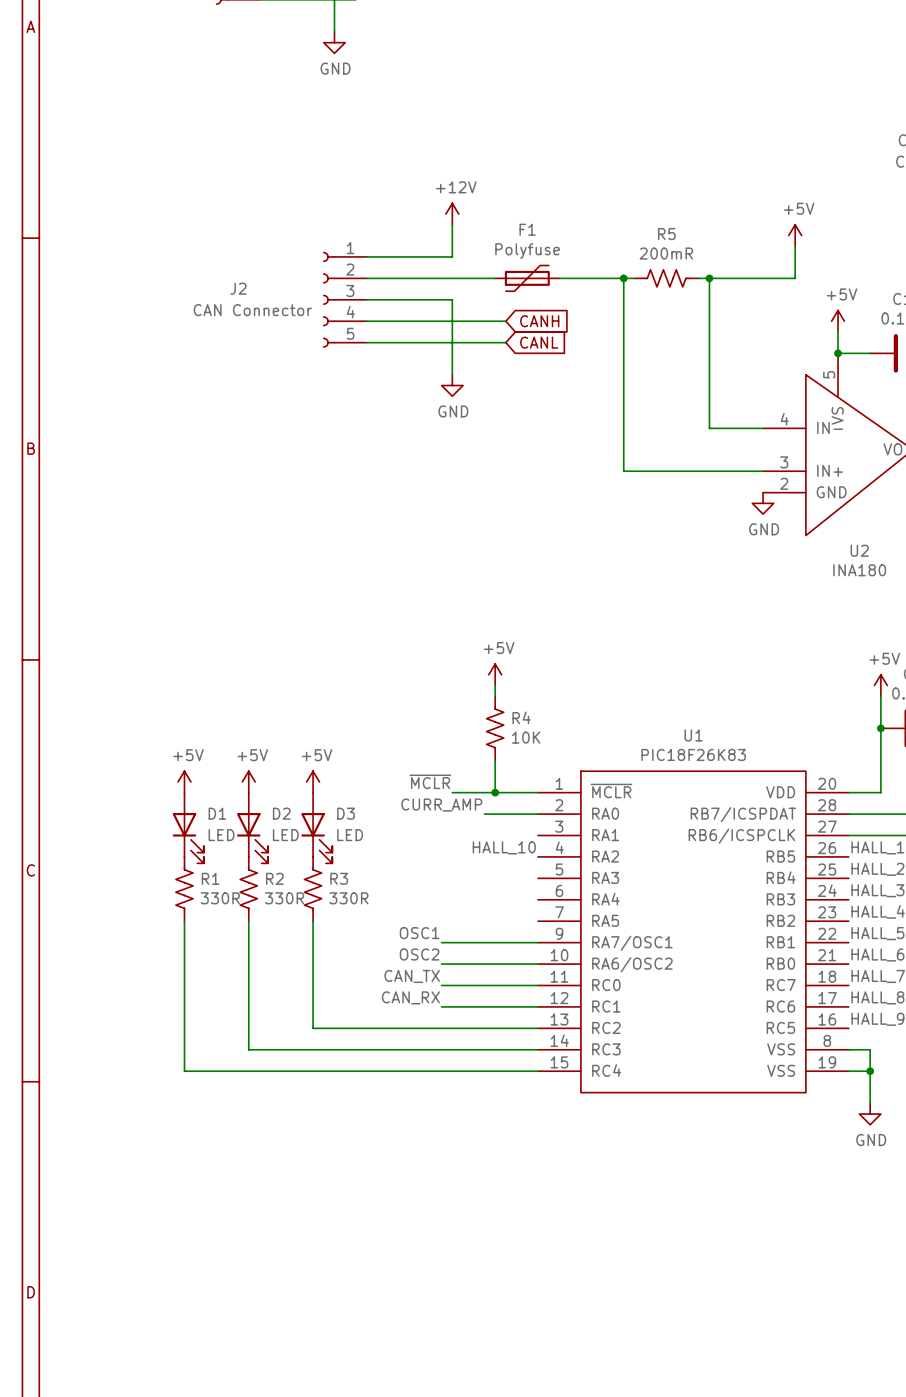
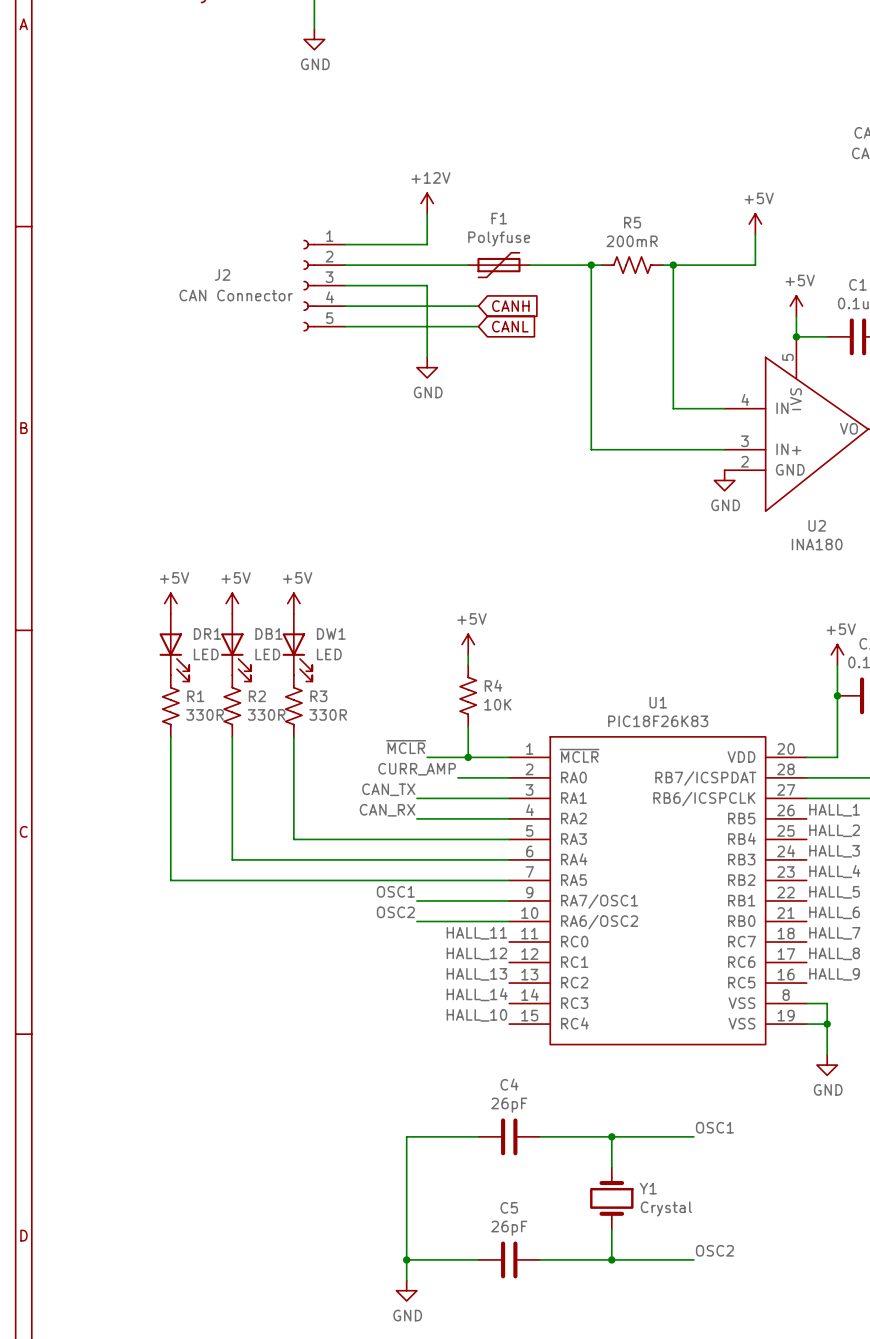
power symbol: none -> +5V (170, 603)
power symbol: none -> +5V (232, 603)
power symbol: none -> +5V (293, 603)
DR1: none -> LED (174, 647)
DB1: none -> LED (235, 647)
DW1: none -> LED (297, 647)
power symbol: +5V (184, 781) -> none
power symbol: +5V (248, 781) -> none
power symbol: +5V (313, 781) -> none
D1: LED (188, 828) -> none
D2: LED (252, 828) -> none
D3: LED (316, 828) -> none
label: HALL_10 (504, 847) -> none
R1 position: (184, 889) -> (170, 706)
R2 position: (248, 889) -> (232, 706)
R3 position: (313, 889) -> (293, 706)
wire: (184, 921) (184, 1071) (538, 1071) -> (170, 736) (170, 880) (509, 880)
wire: (248, 921) (248, 1049) (538, 1049) -> (232, 736) (232, 859) (509, 859)
wire: (313, 921) (313, 1028) (538, 1028) -> (293, 736) (293, 839) (509, 839)
label position: CAN_TX (412, 976) -> CAN_TX (388, 789)
label: none -> HALL_11 (476, 933)
wire: (441, 985) (538, 985) -> (416, 798) (509, 798)
label position: CAN_RX (410, 997) -> CAN_RX (387, 810)
label: none -> HALL_12 (476, 953)
wire: (441, 1006) (538, 1006) -> (416, 818) (509, 818)
label: none -> HALL_13 (476, 974)
label: none -> HALL_14 (477, 994)
label: none -> HALL_10 (476, 1015)
label: none -> OSC1 (714, 1127)
wire: none -> (478, 1136) (406, 1136) (406, 1280)
C4: none -> 26pF (509, 1136)
wire: none -> (540, 1136) (693, 1136)
wire: none -> (611, 1136) (611, 1167)
junction: none -> (611, 1136)
Y1: none -> Crystal (611, 1198)
wire: none -> (611, 1229) (611, 1259)
label: none -> OSC2 (714, 1250)
wire: none -> (406, 1259) (478, 1259)
junction: none -> (406, 1259)
C5: none -> 26pF (509, 1259)
wire: none -> (540, 1259) (693, 1259)
junction: none -> (611, 1259)
power symbol: none -> GND (406, 1290)

